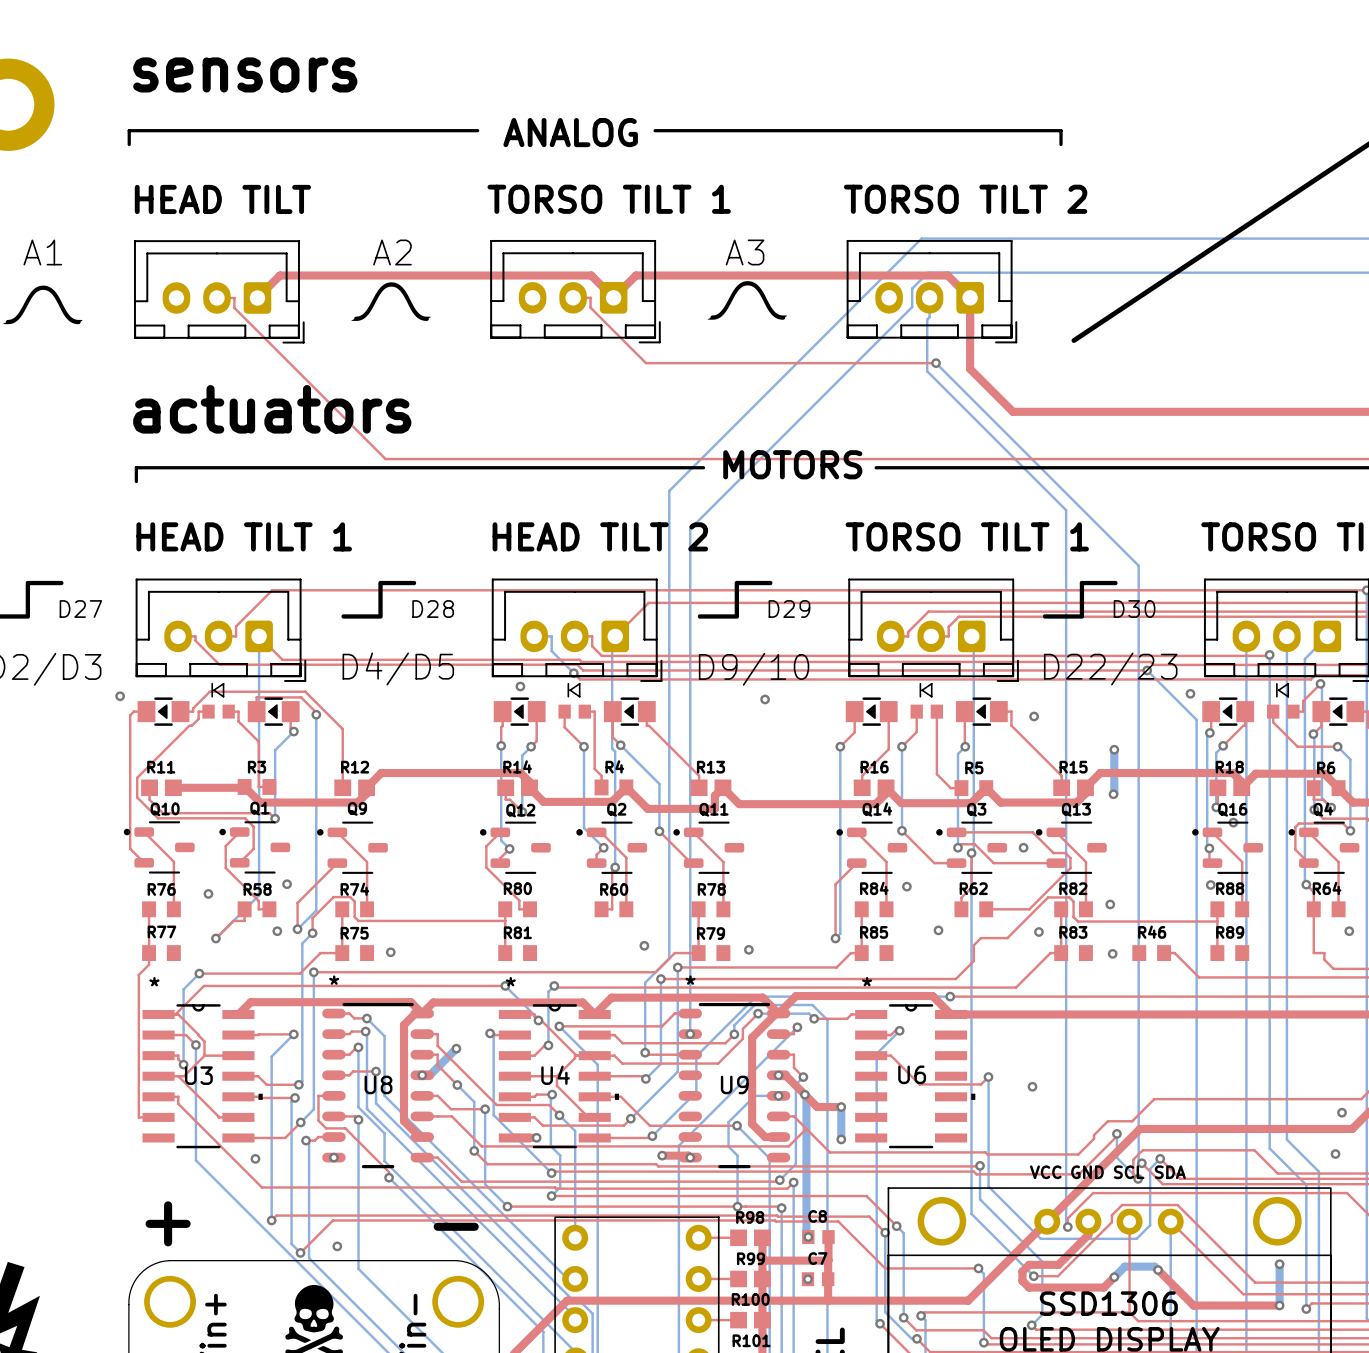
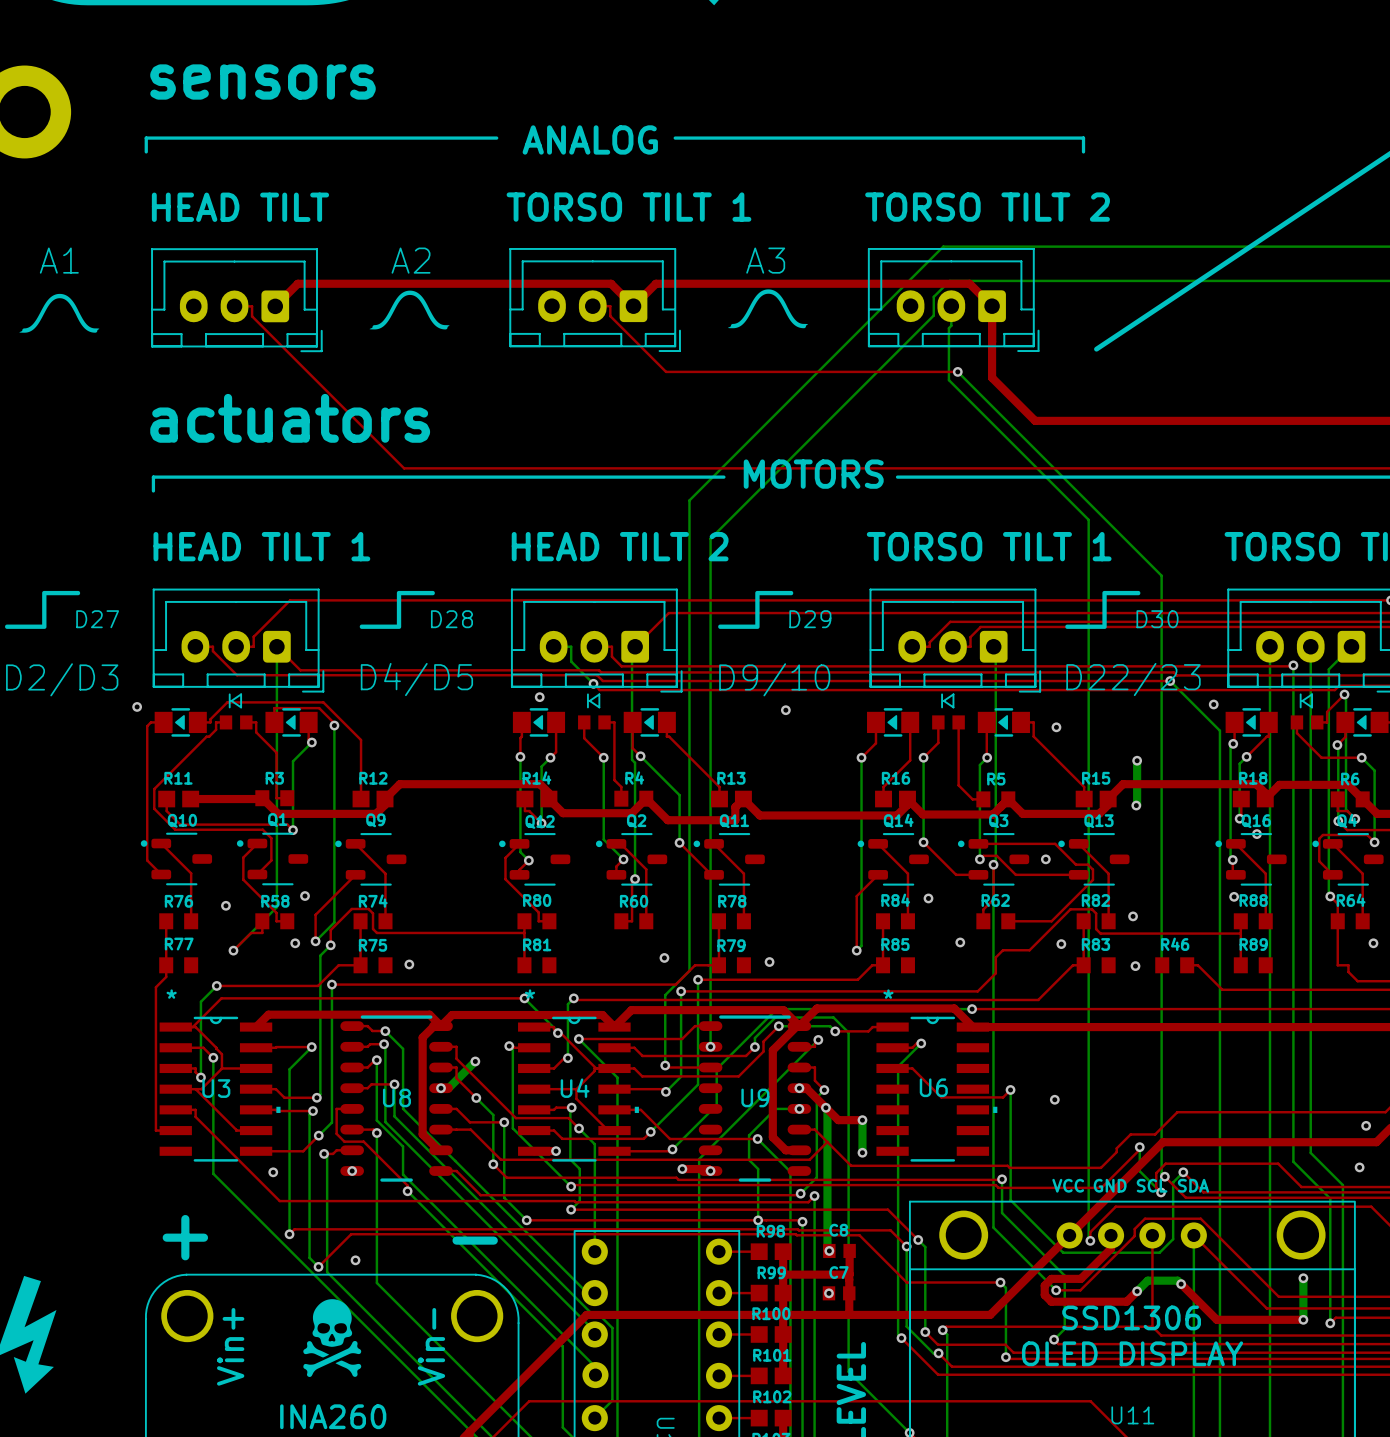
U8 text: * (334, 980) -> none
U9 text: * (690, 980) -> none

